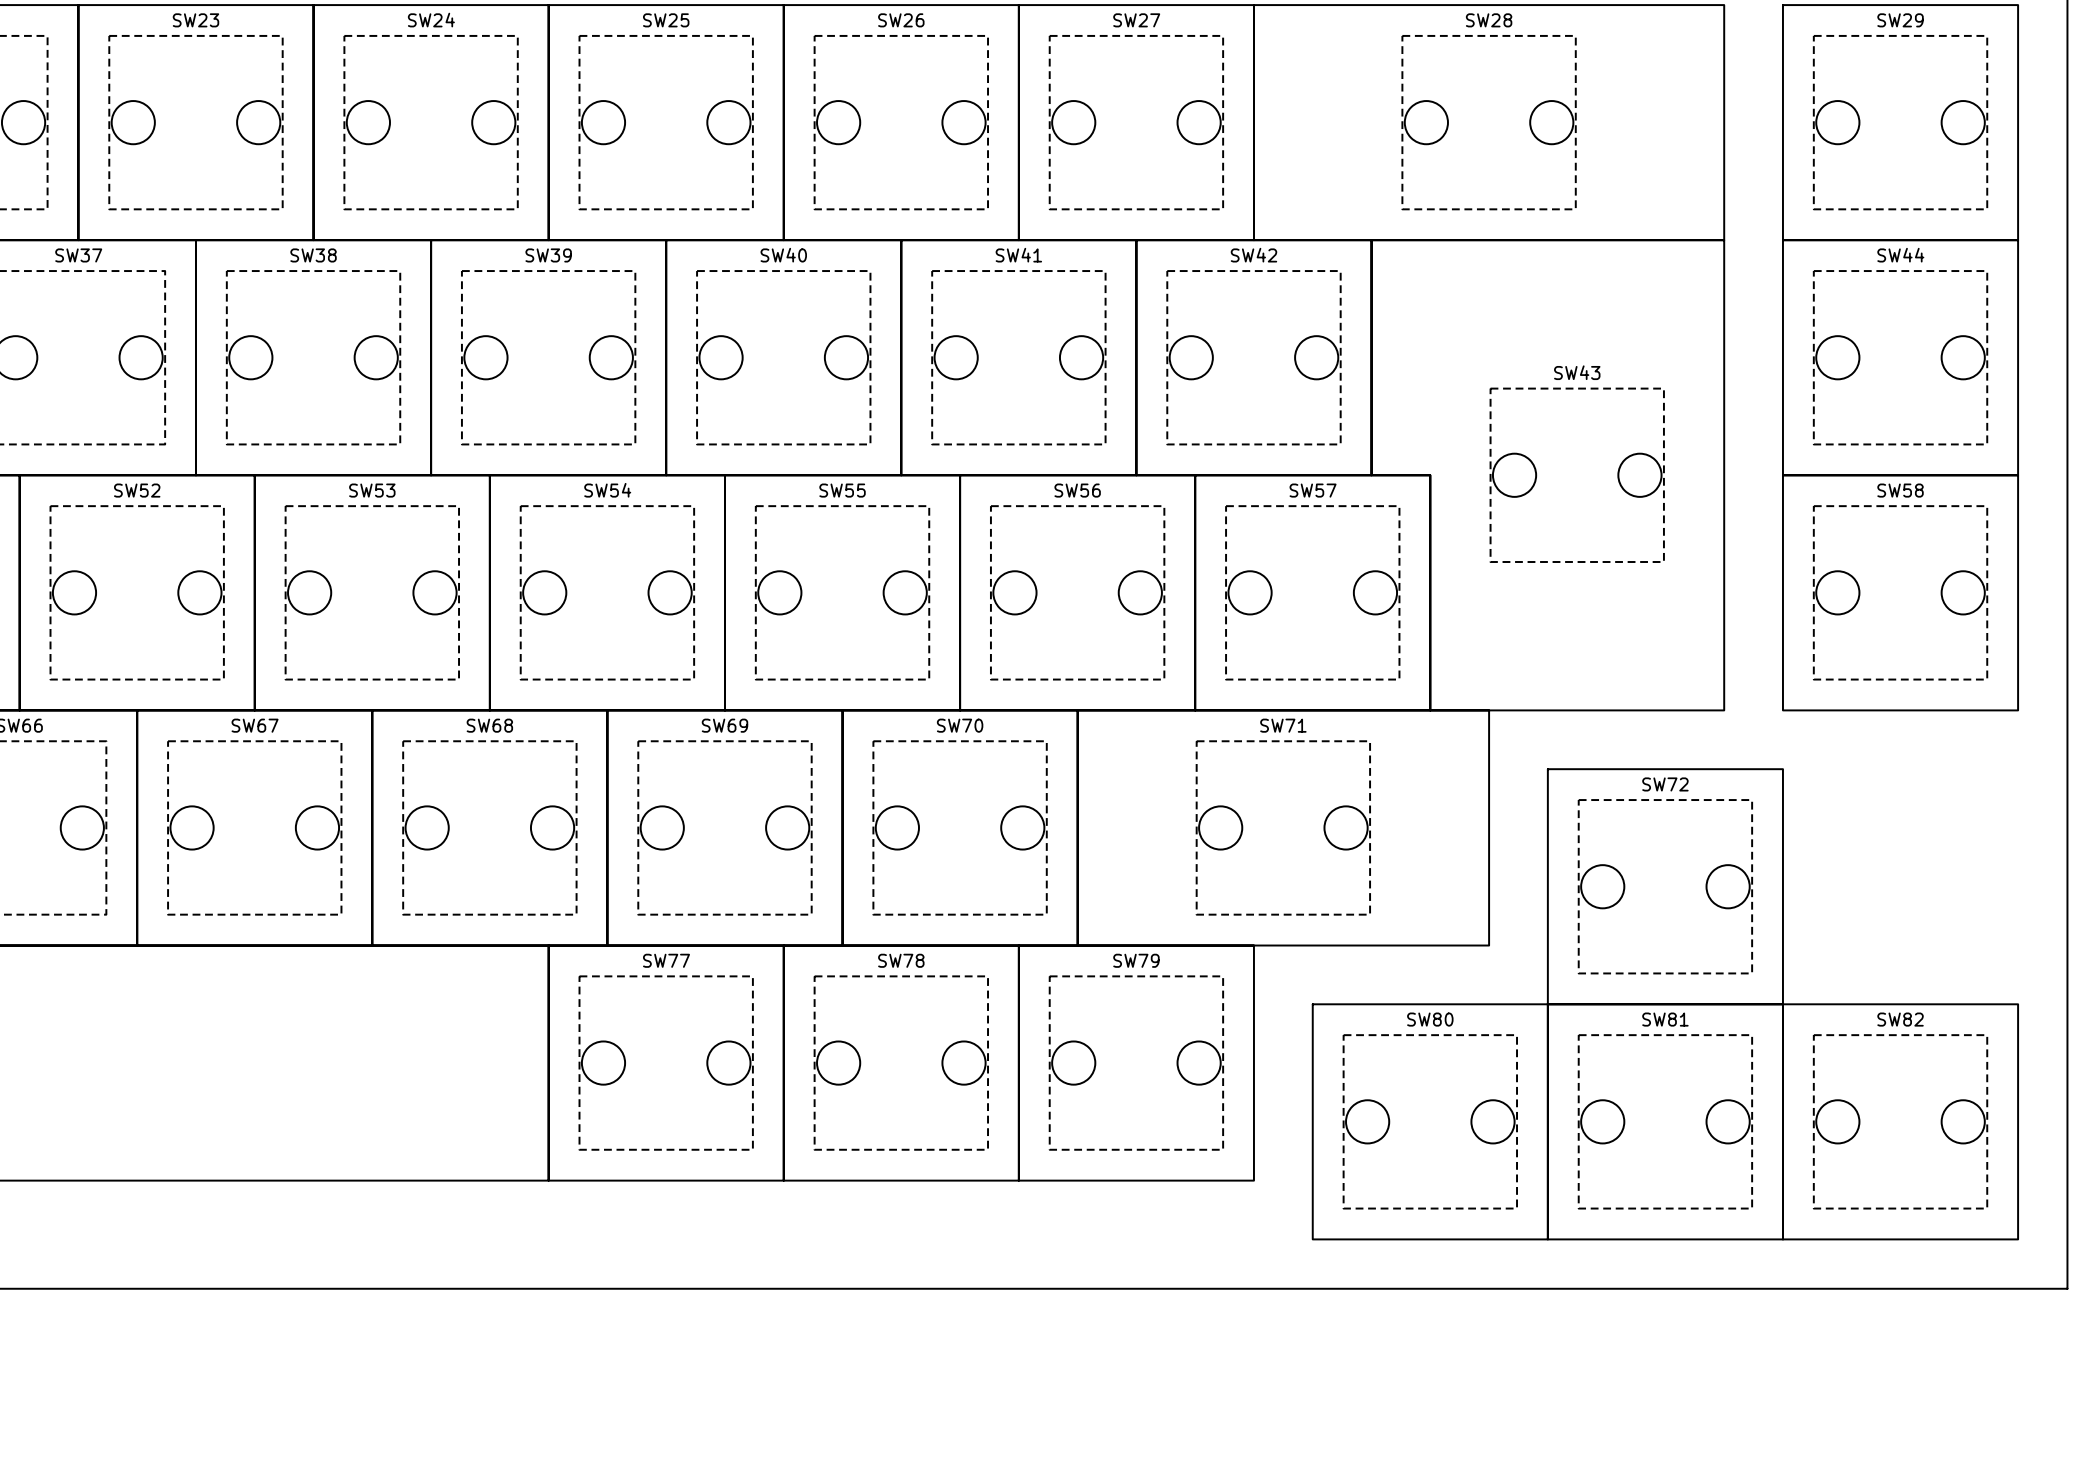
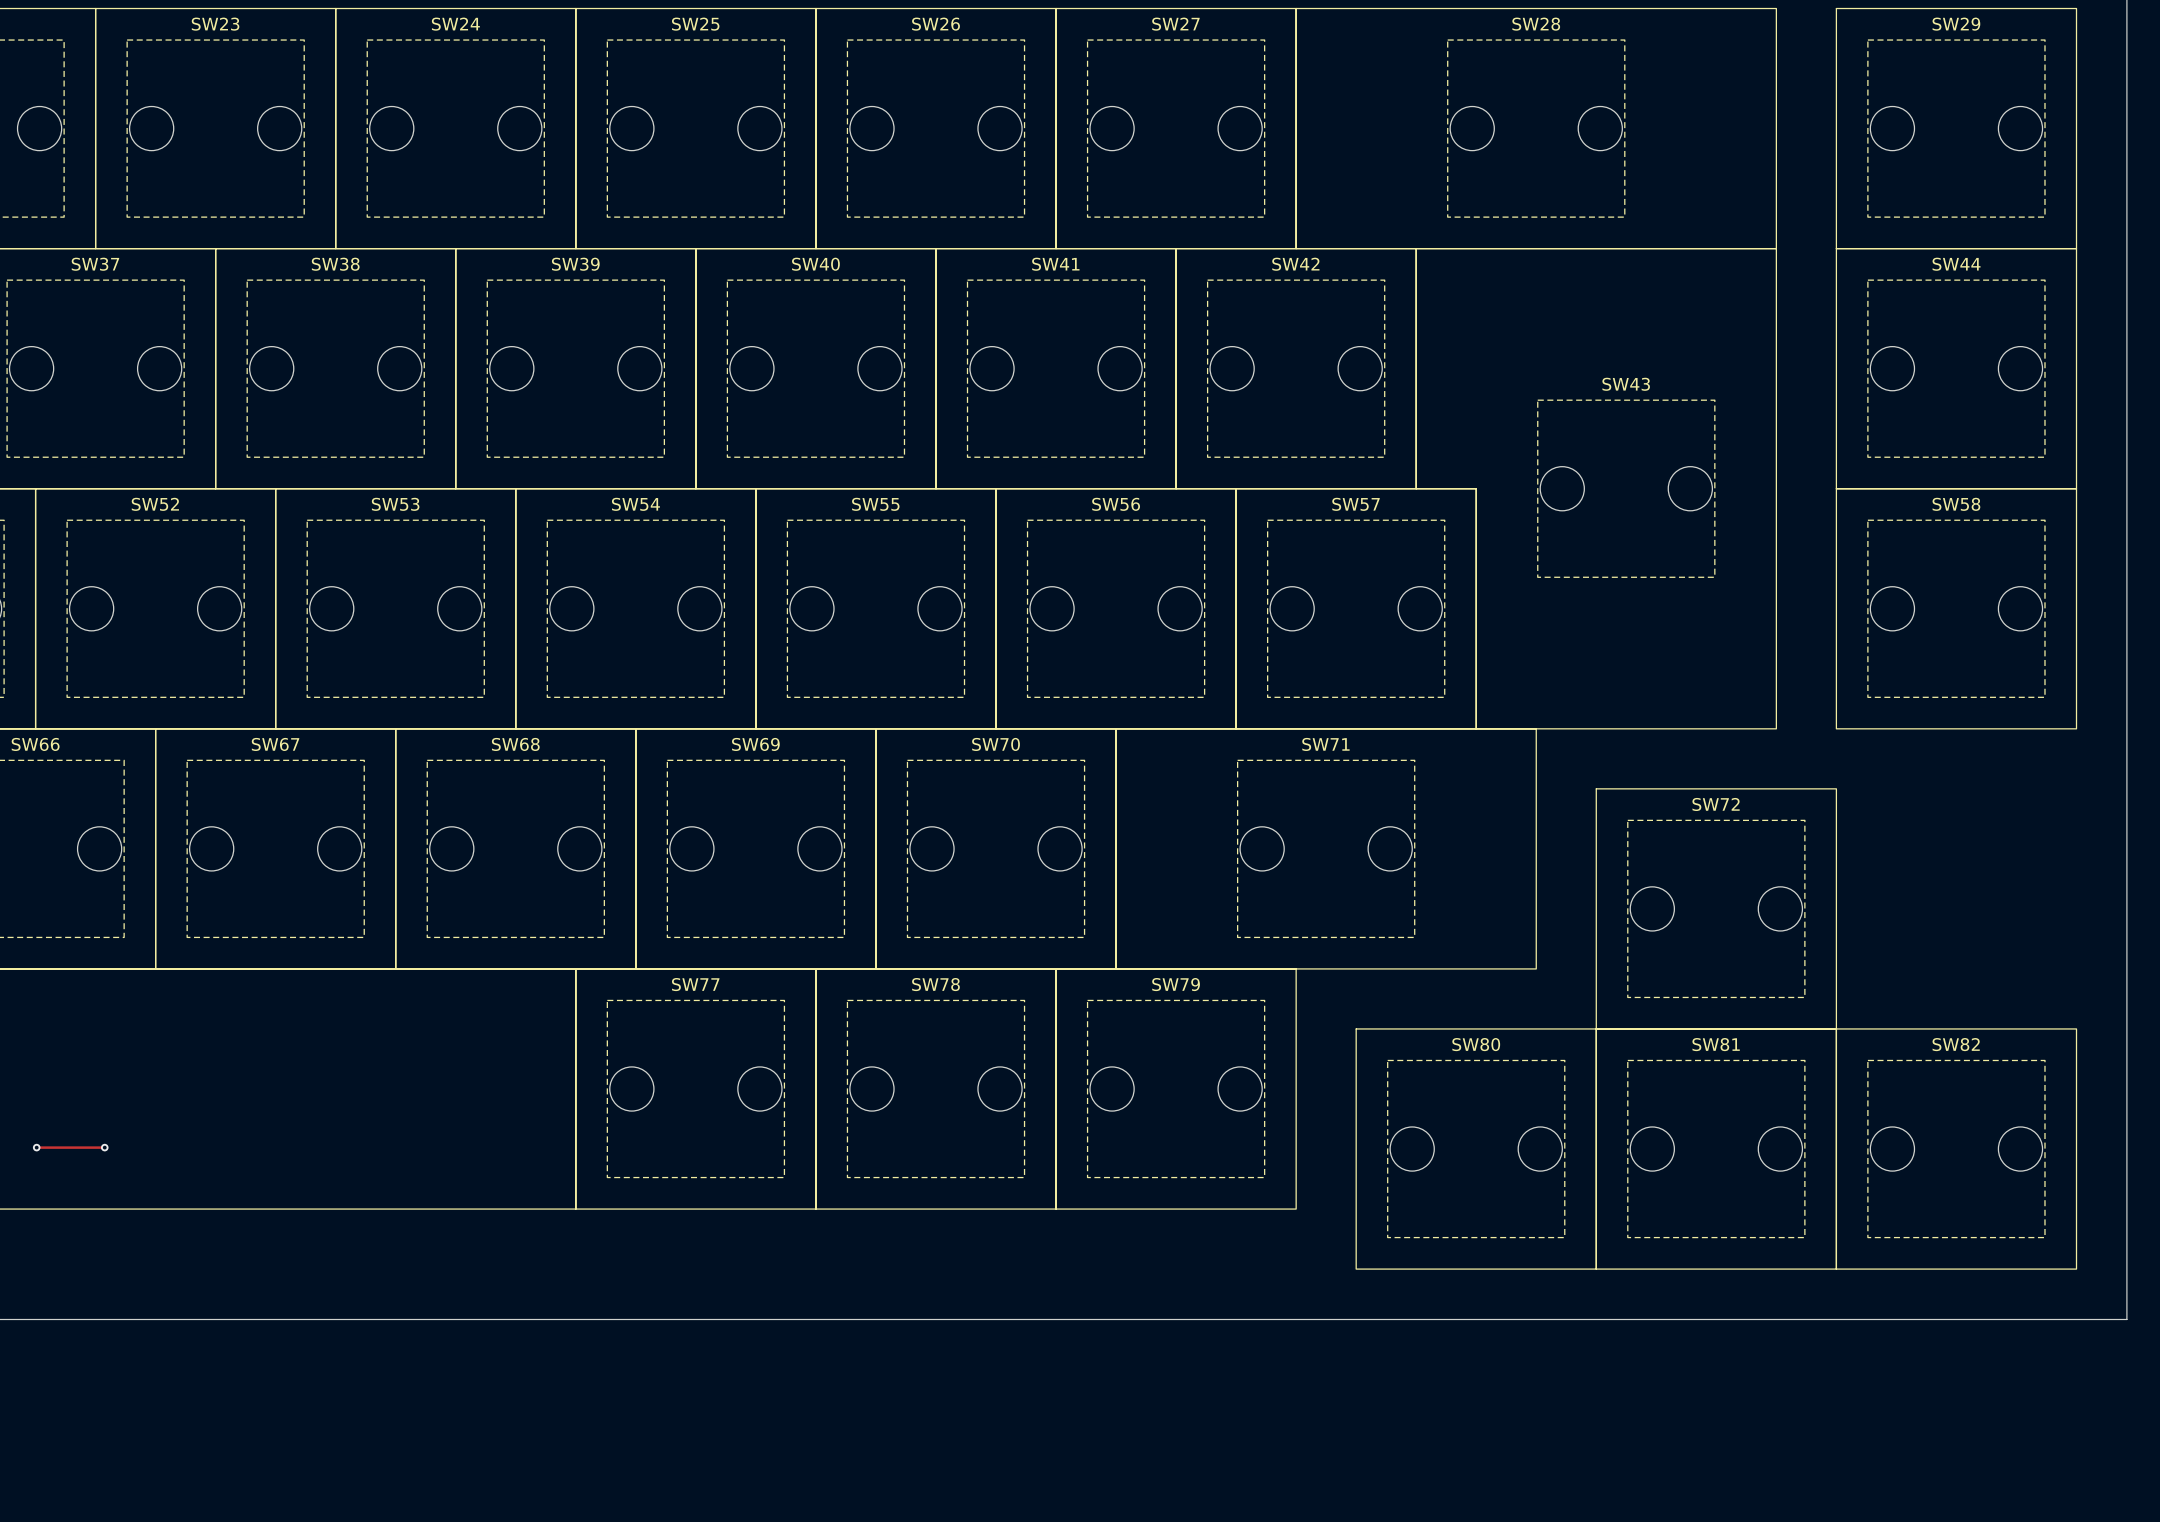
track: none -> (36, 1147) (104, 1147)
via: none -> (36, 1147)
via: none -> (104, 1147)

